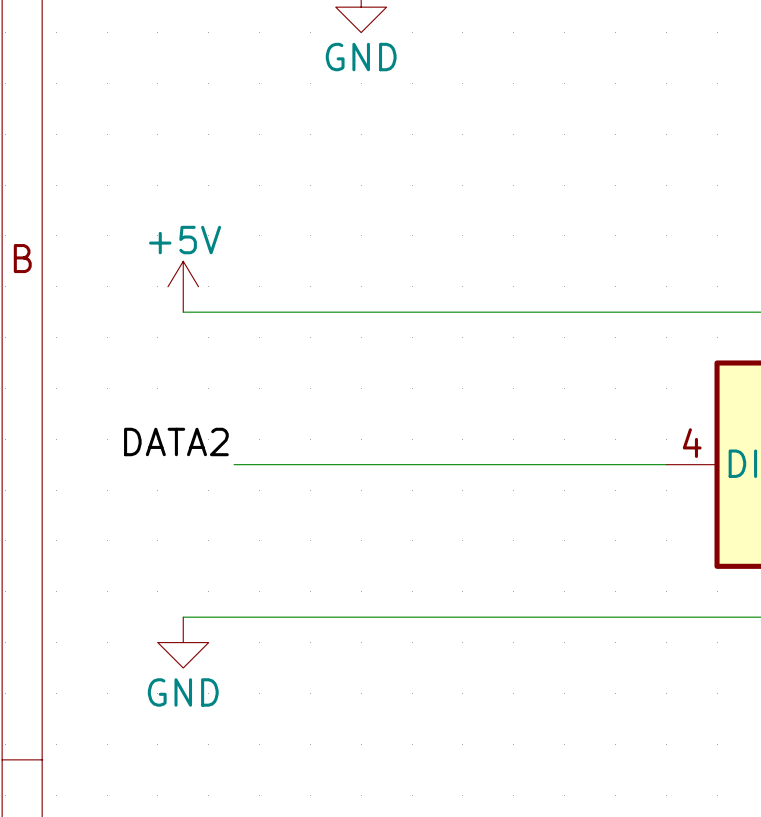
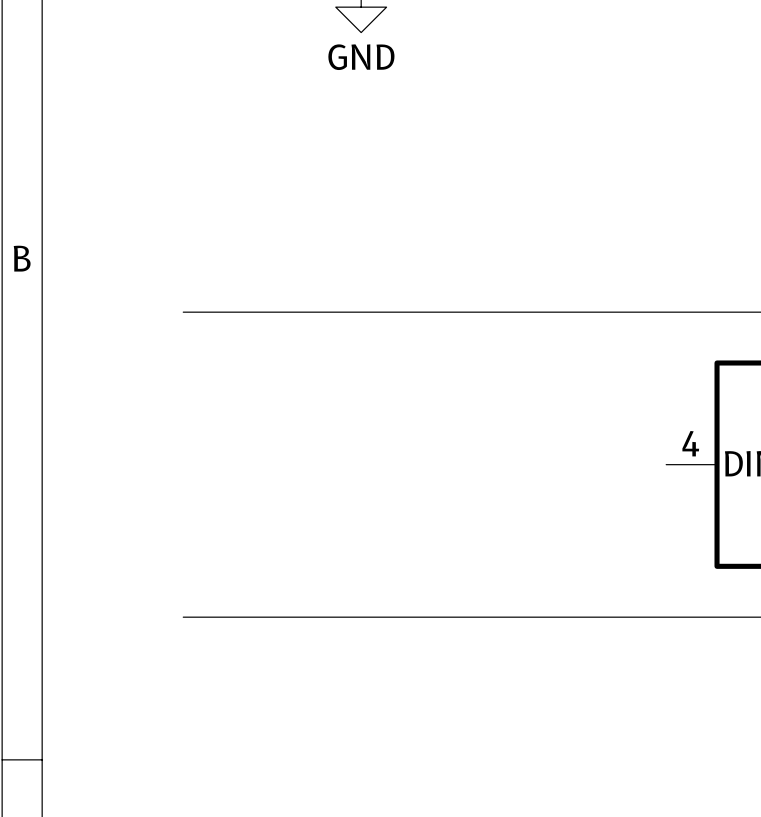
power symbol: +5V (183, 286) -> none
label: DATA2 (176, 441) -> none
wire: (234, 464) (666, 464) -> none
power symbol: GND (183, 642) -> none

